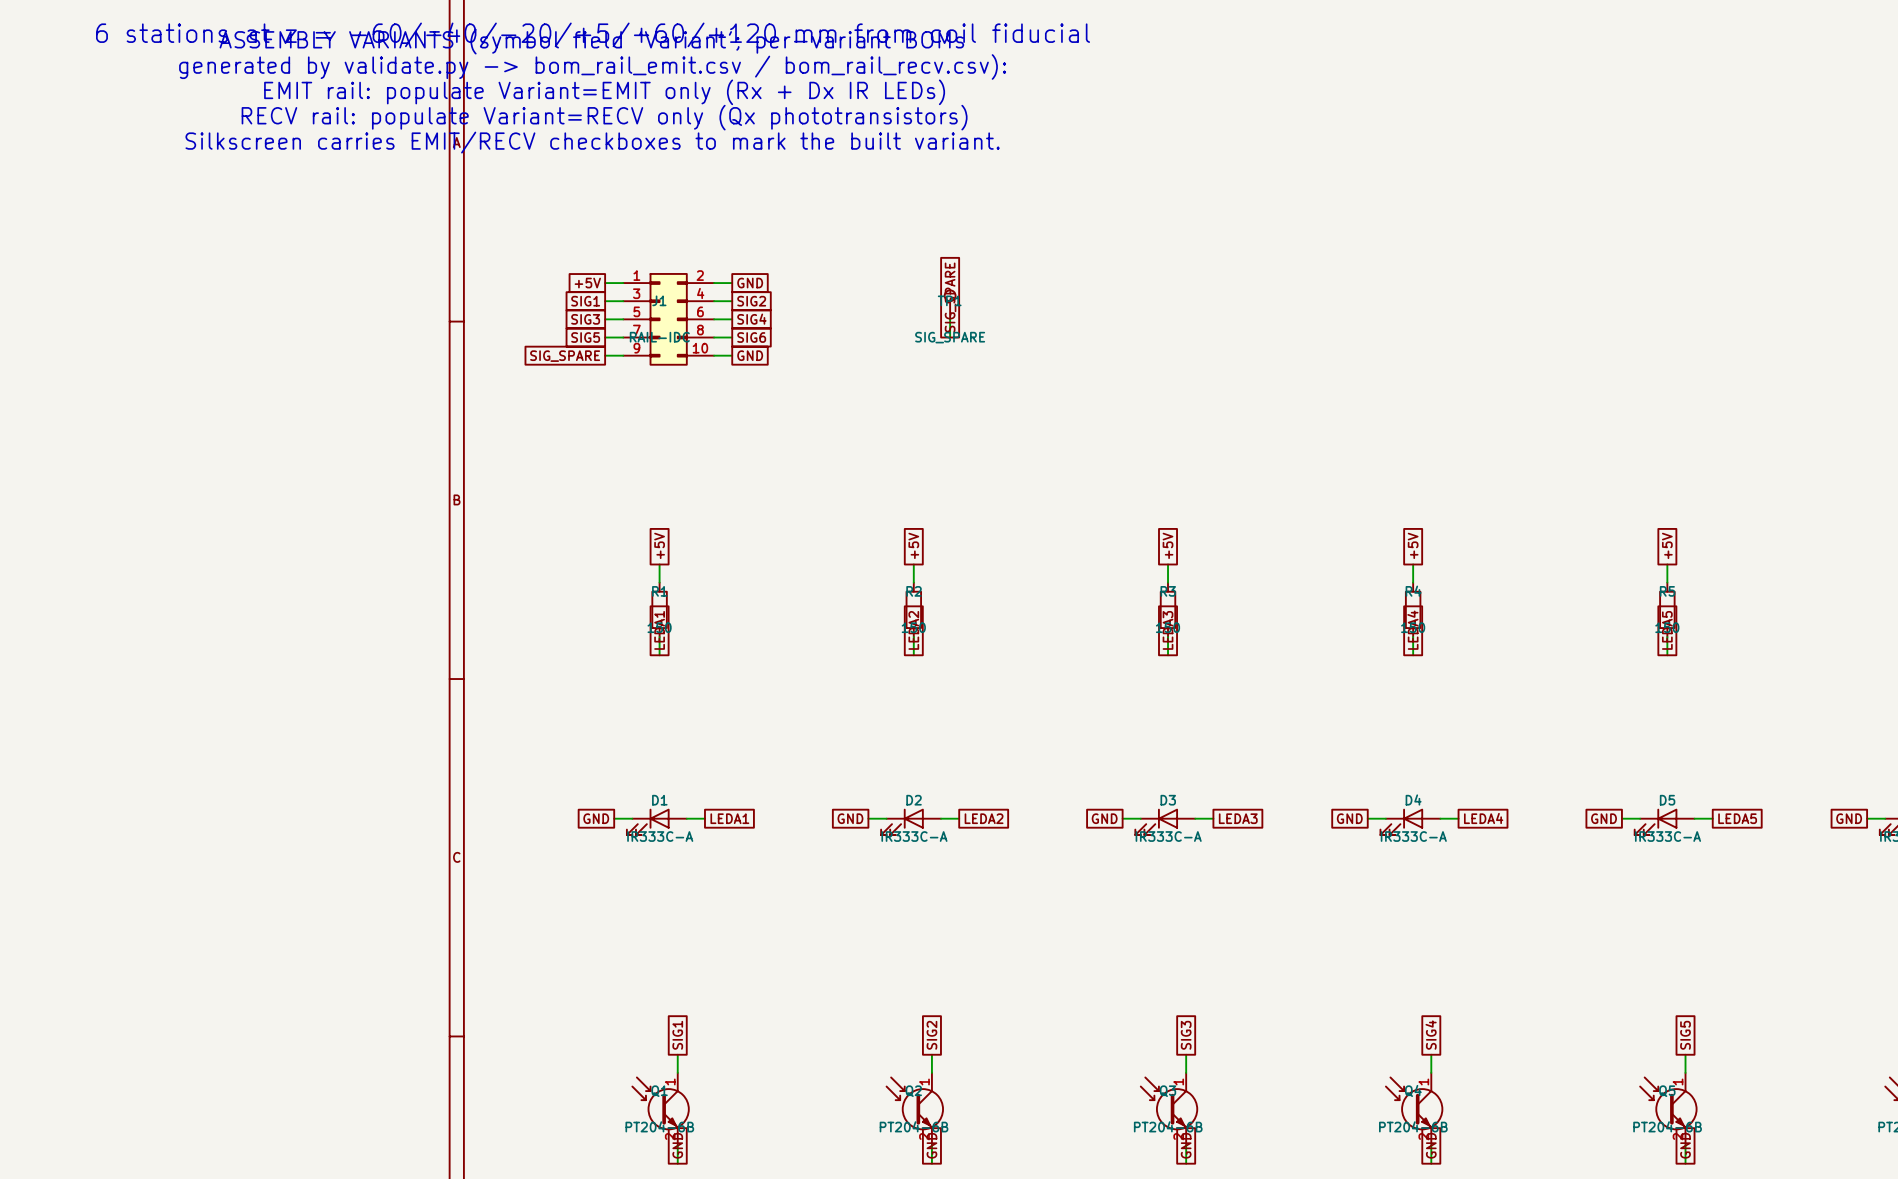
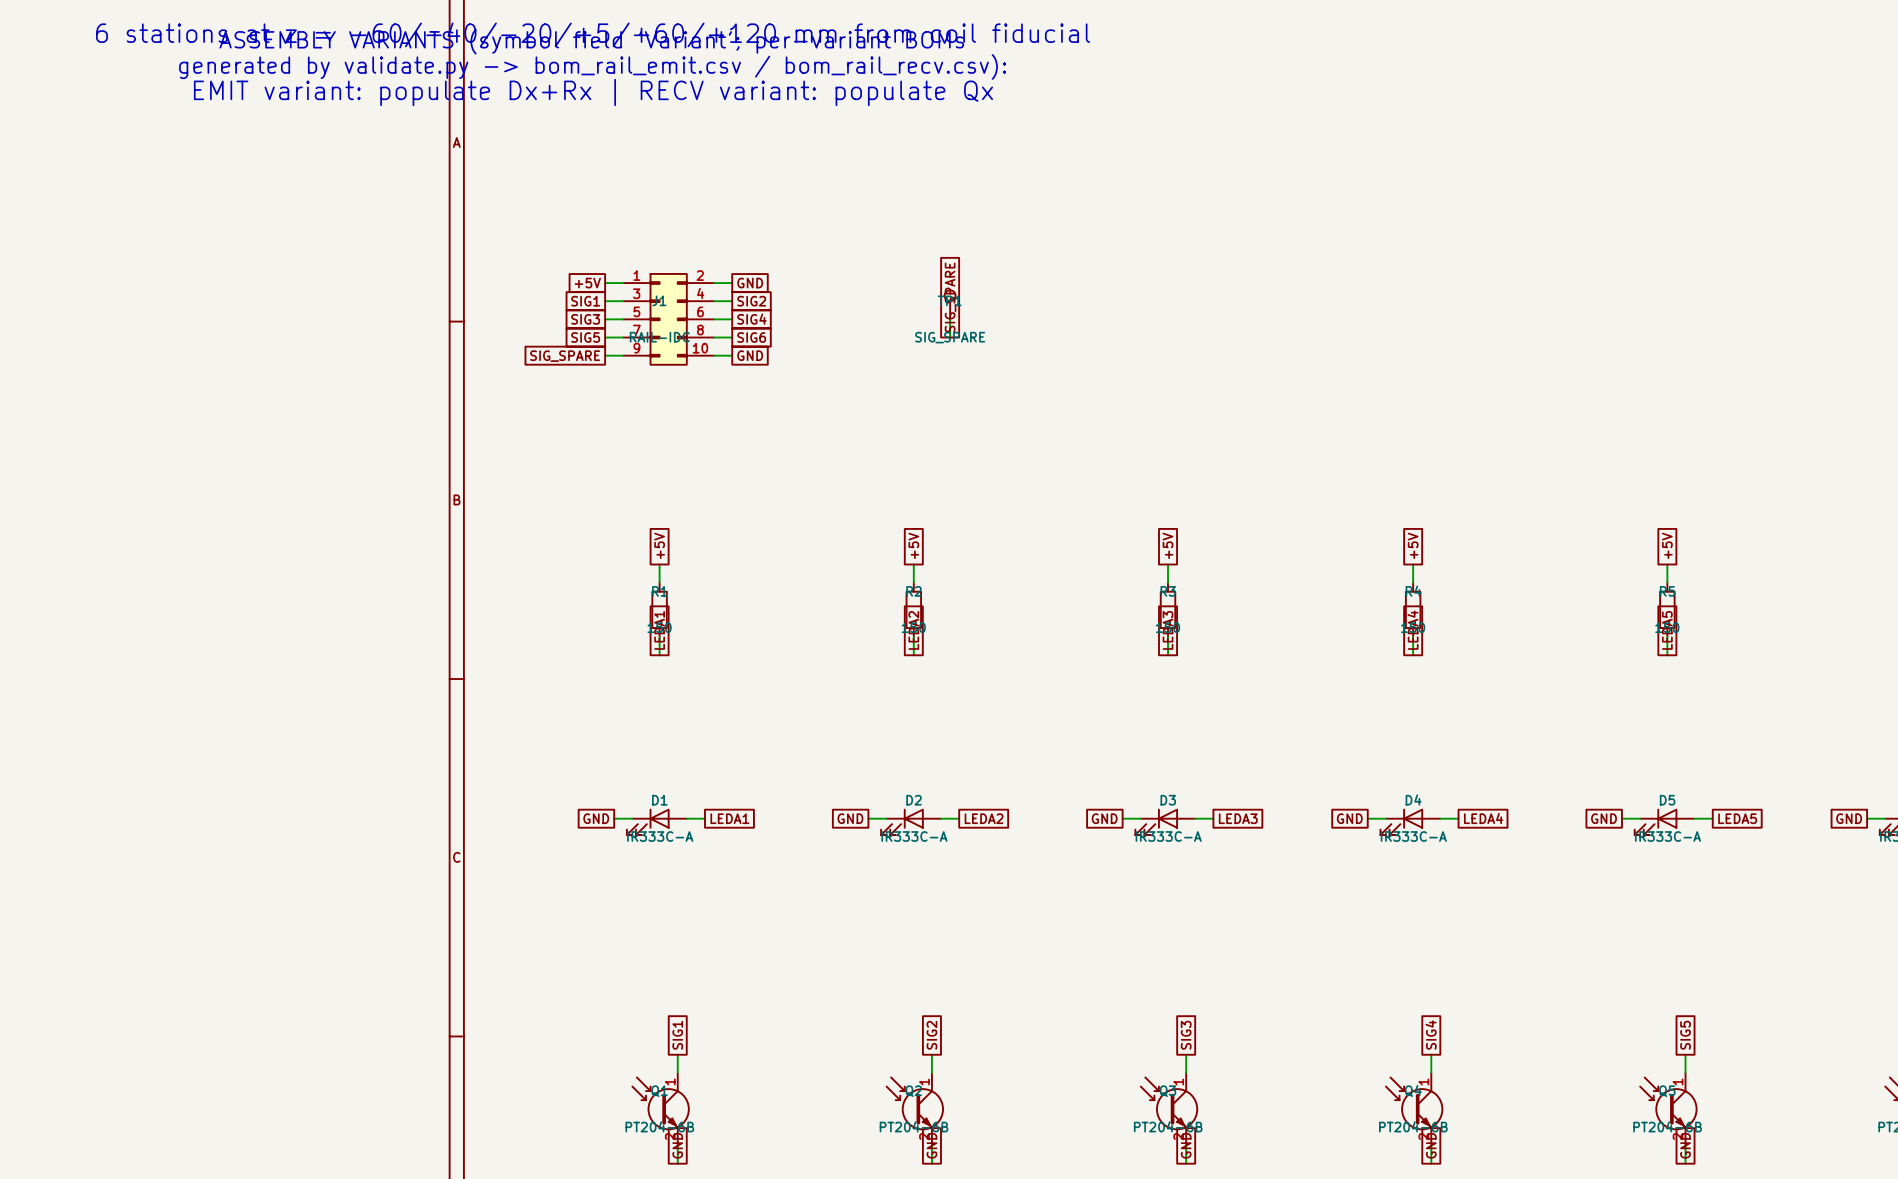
text: EMIT rail: populate Variant=EMIT only (Rx + Dx IR LEDs) (604, 92) -> EMIT variant: populate Dx+Rx | RECV variant: populate Qx (593, 92)
text: RECV rail: populate Variant=RECV only (Qx phototransistors) (604, 117) -> none
text: Silkscreen carries EMIT/RECV checkboxes to mark the built variant. (592, 142) -> none

